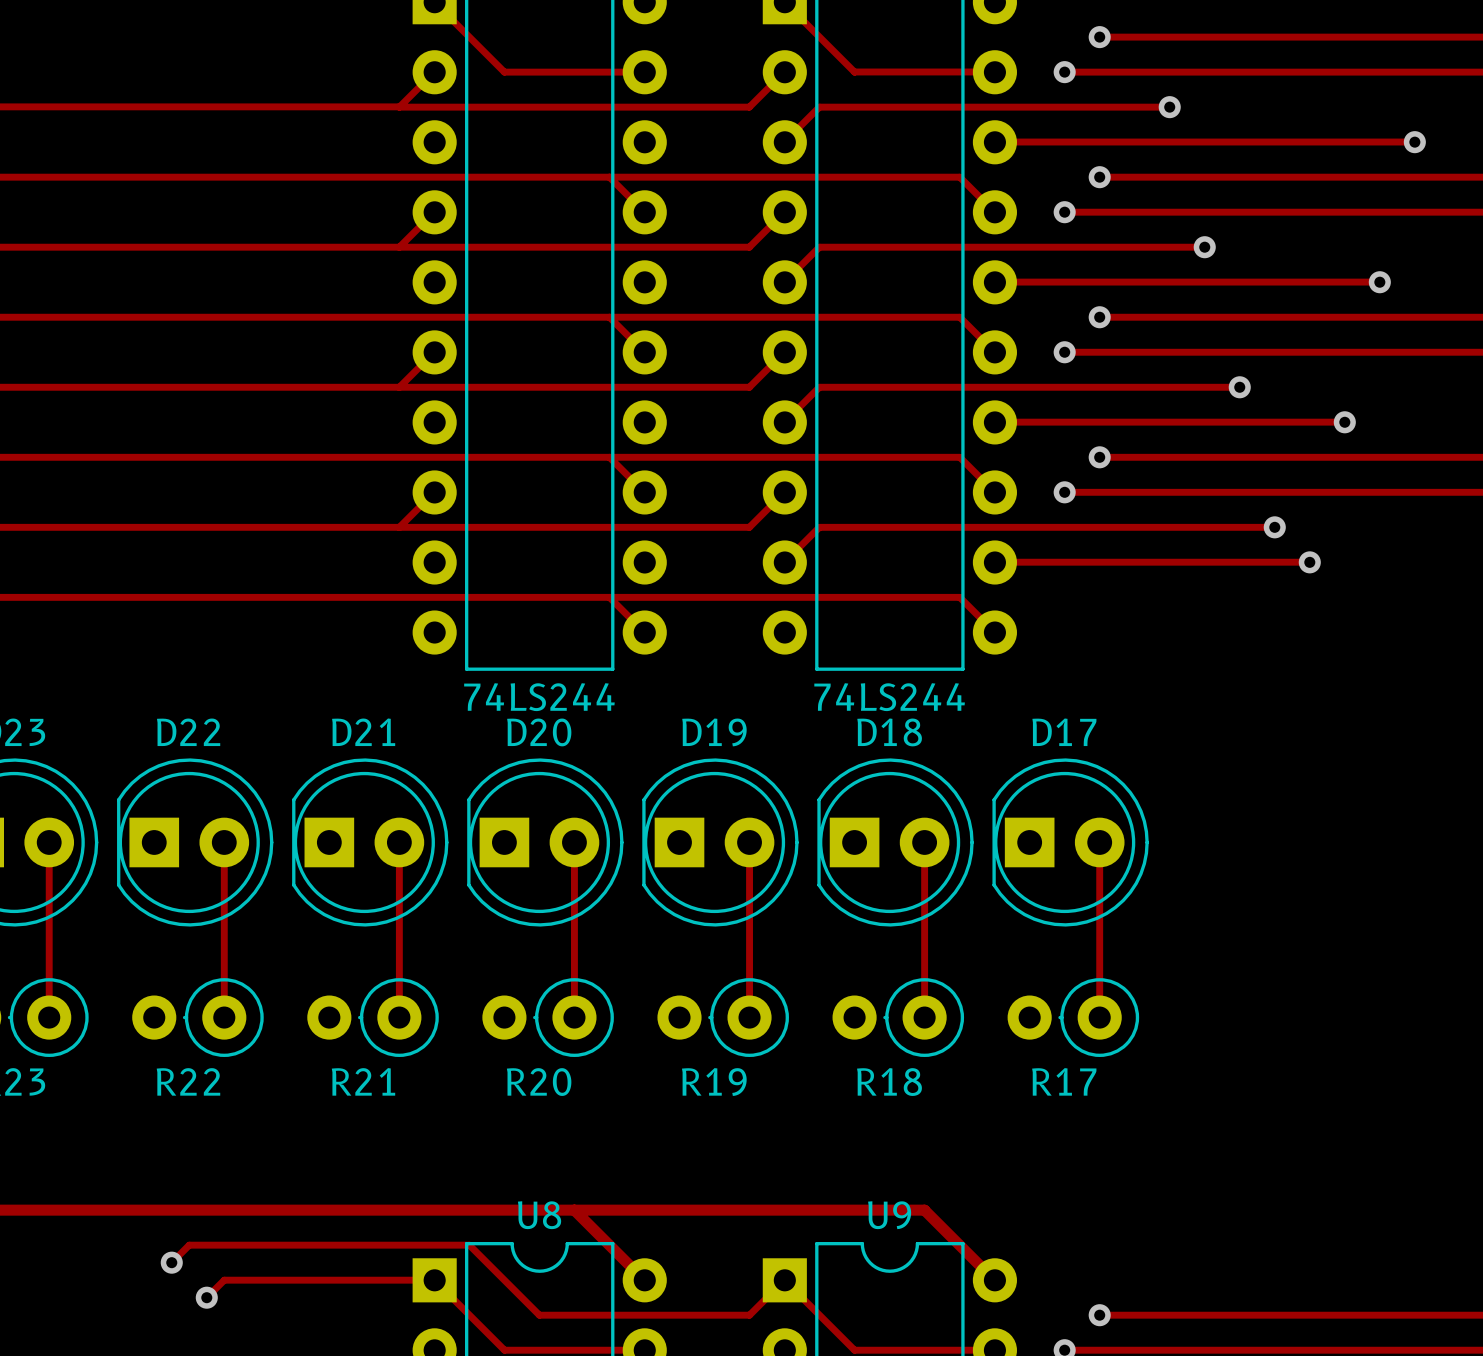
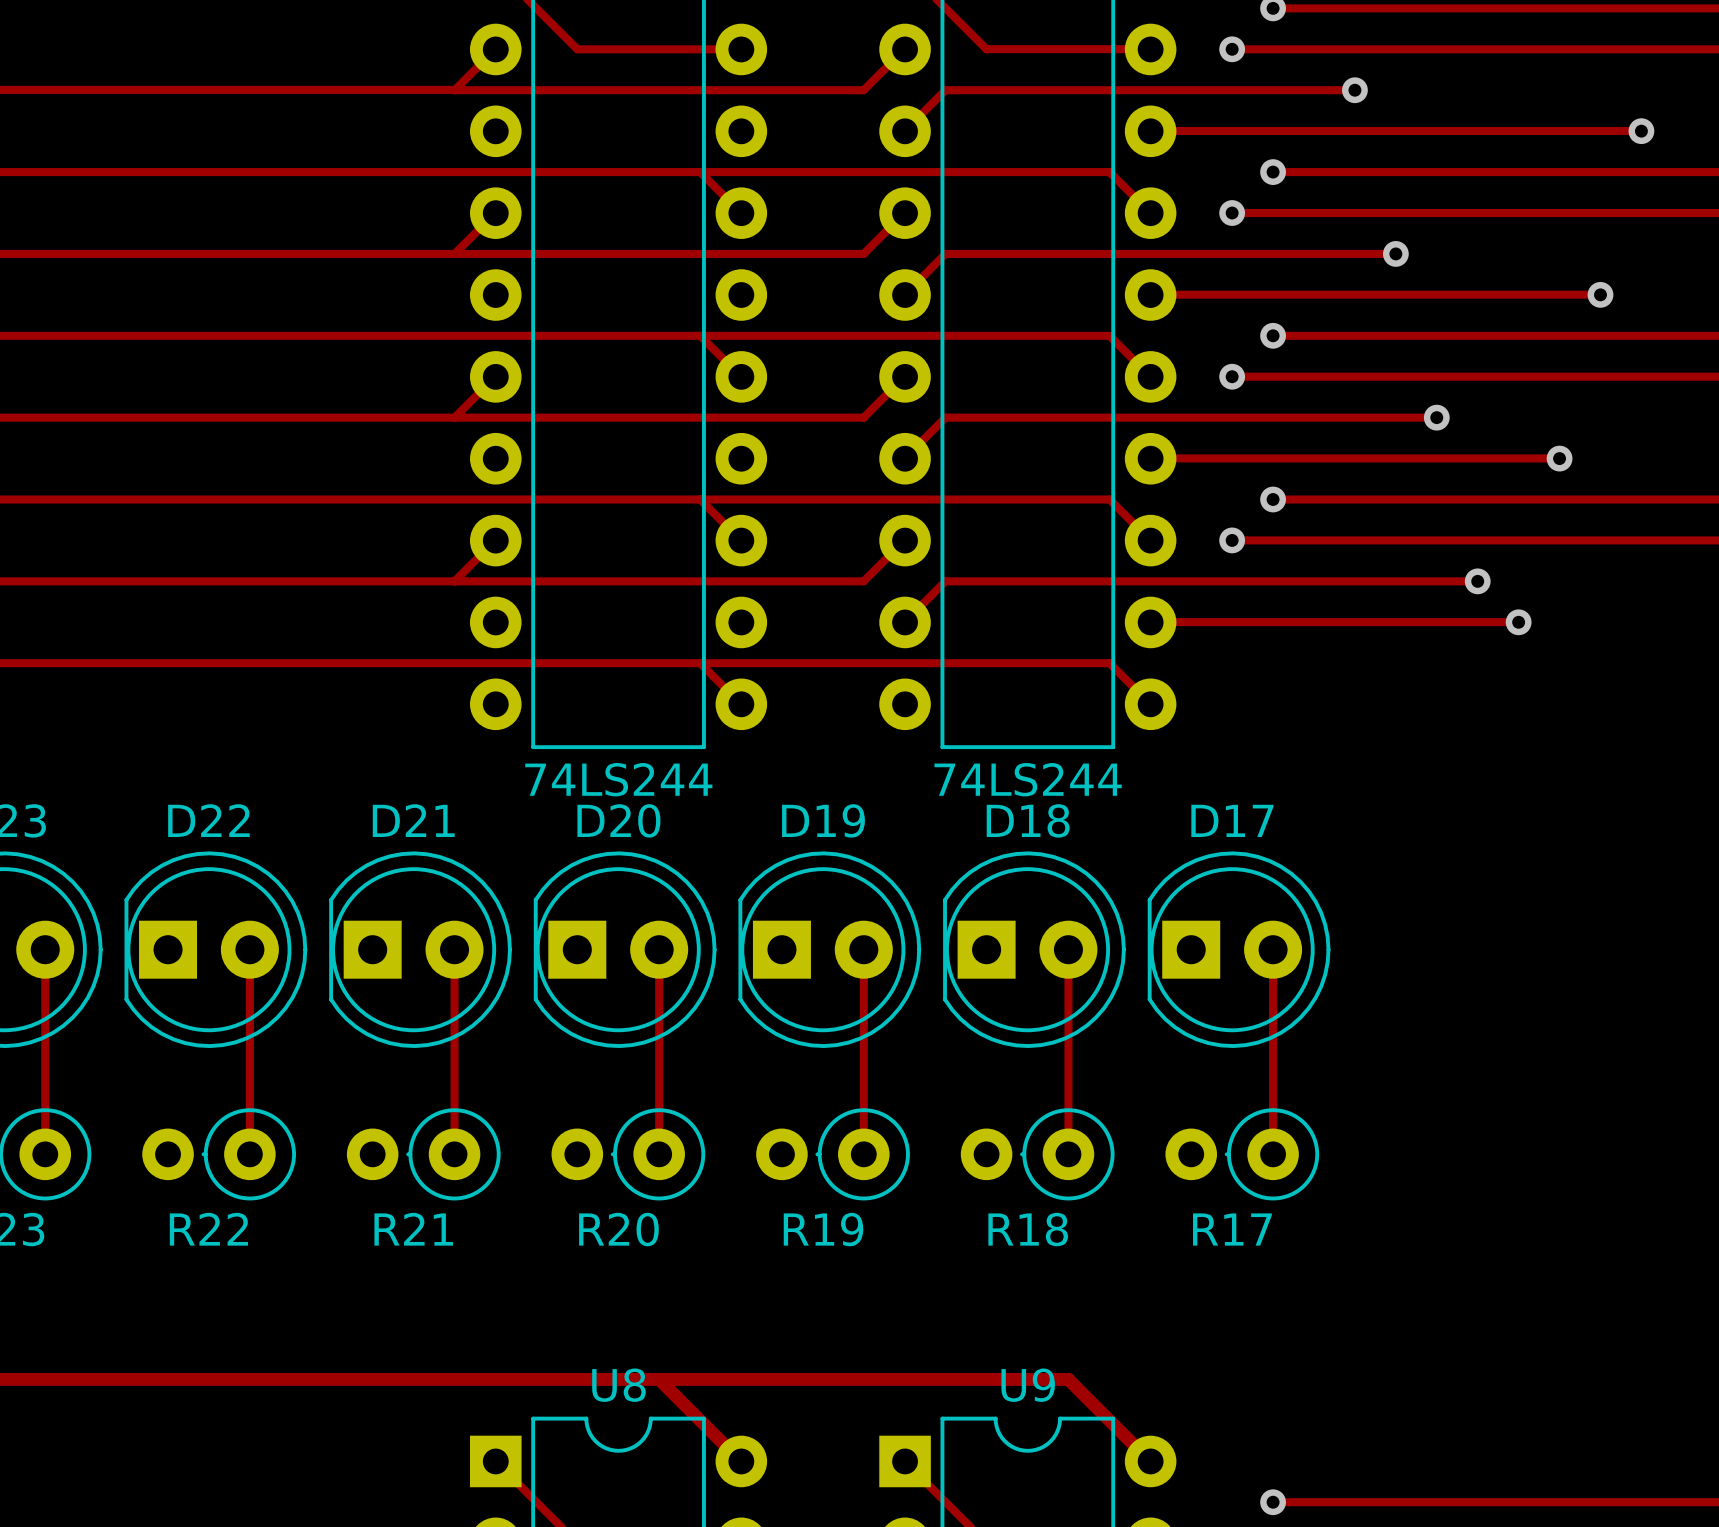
track: (171, 1262) (189, 1245) (469, 1245) (539, 1315) (749, 1315) (784, 1280) -> none
via: (171, 1262) -> none
track: (434, 1280) (224, 1280) (206, 1297) -> none
via: (206, 1297) -> none

